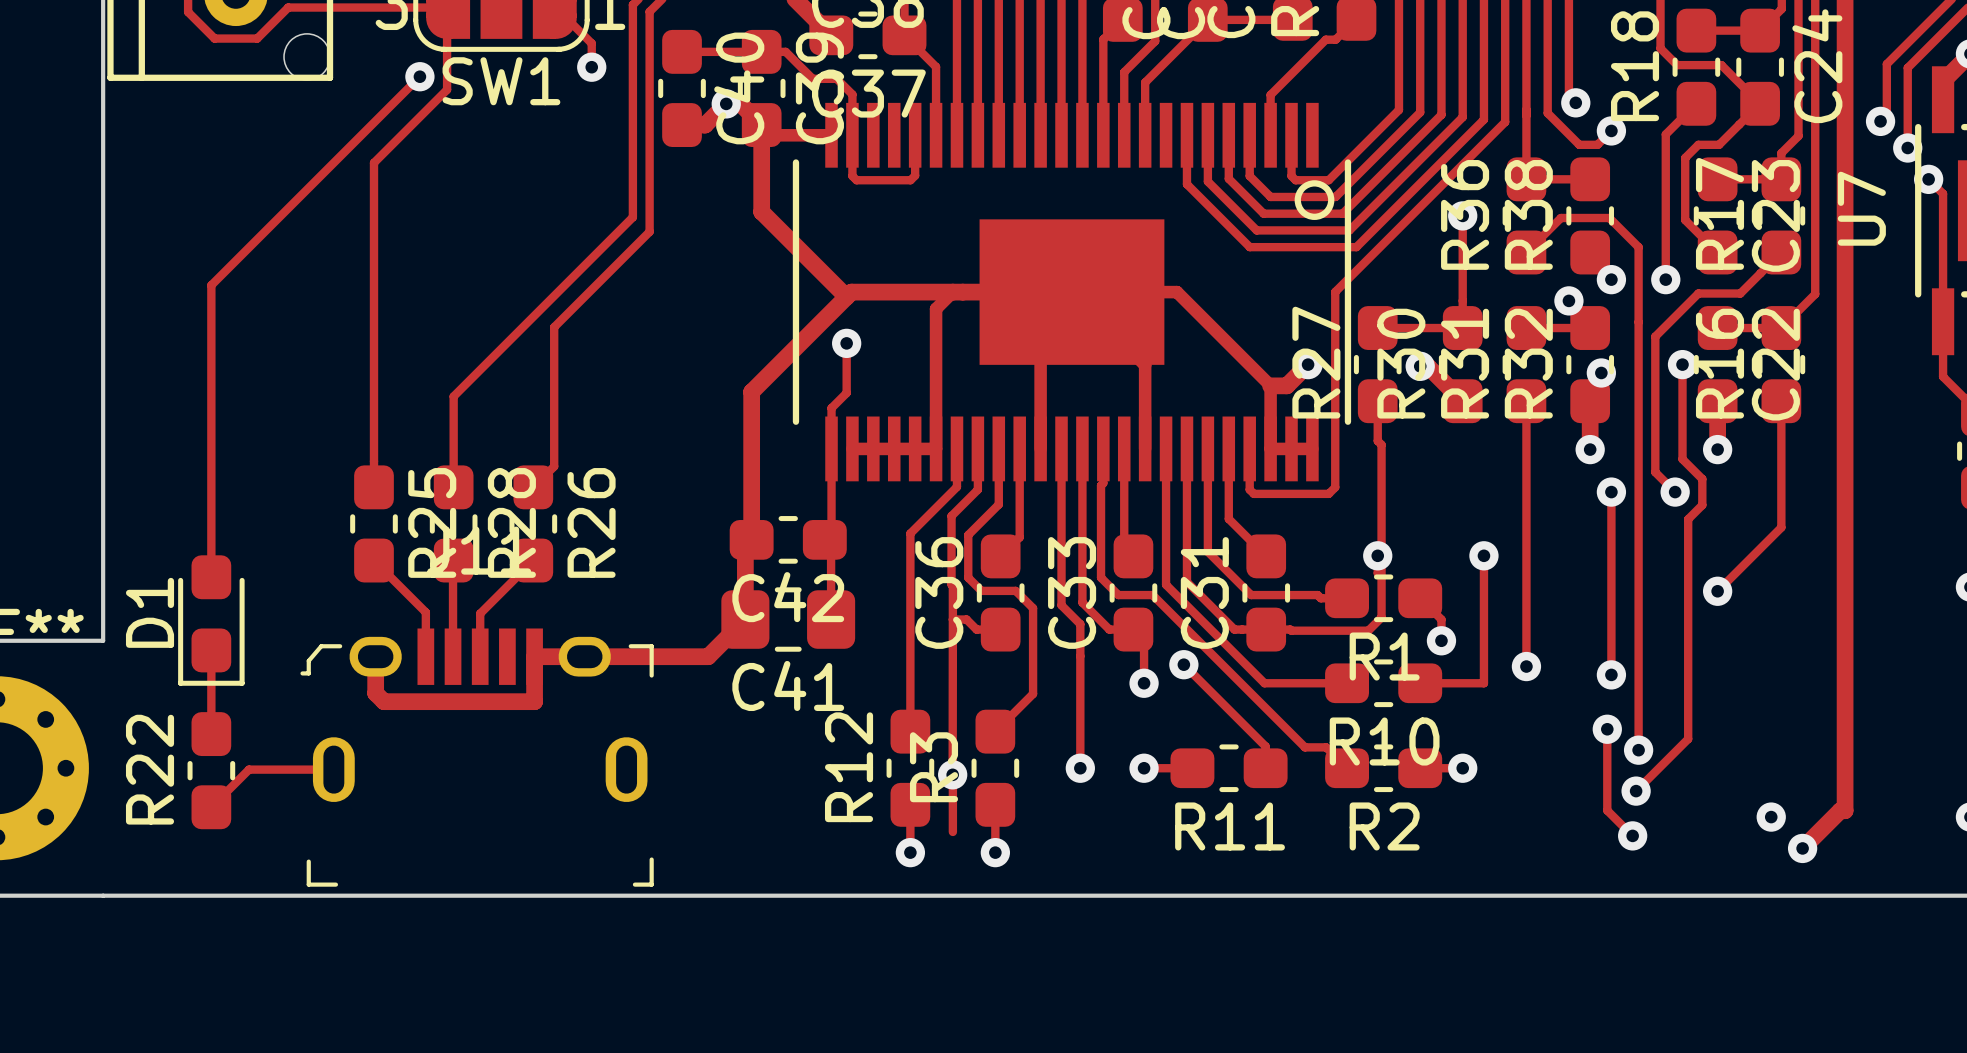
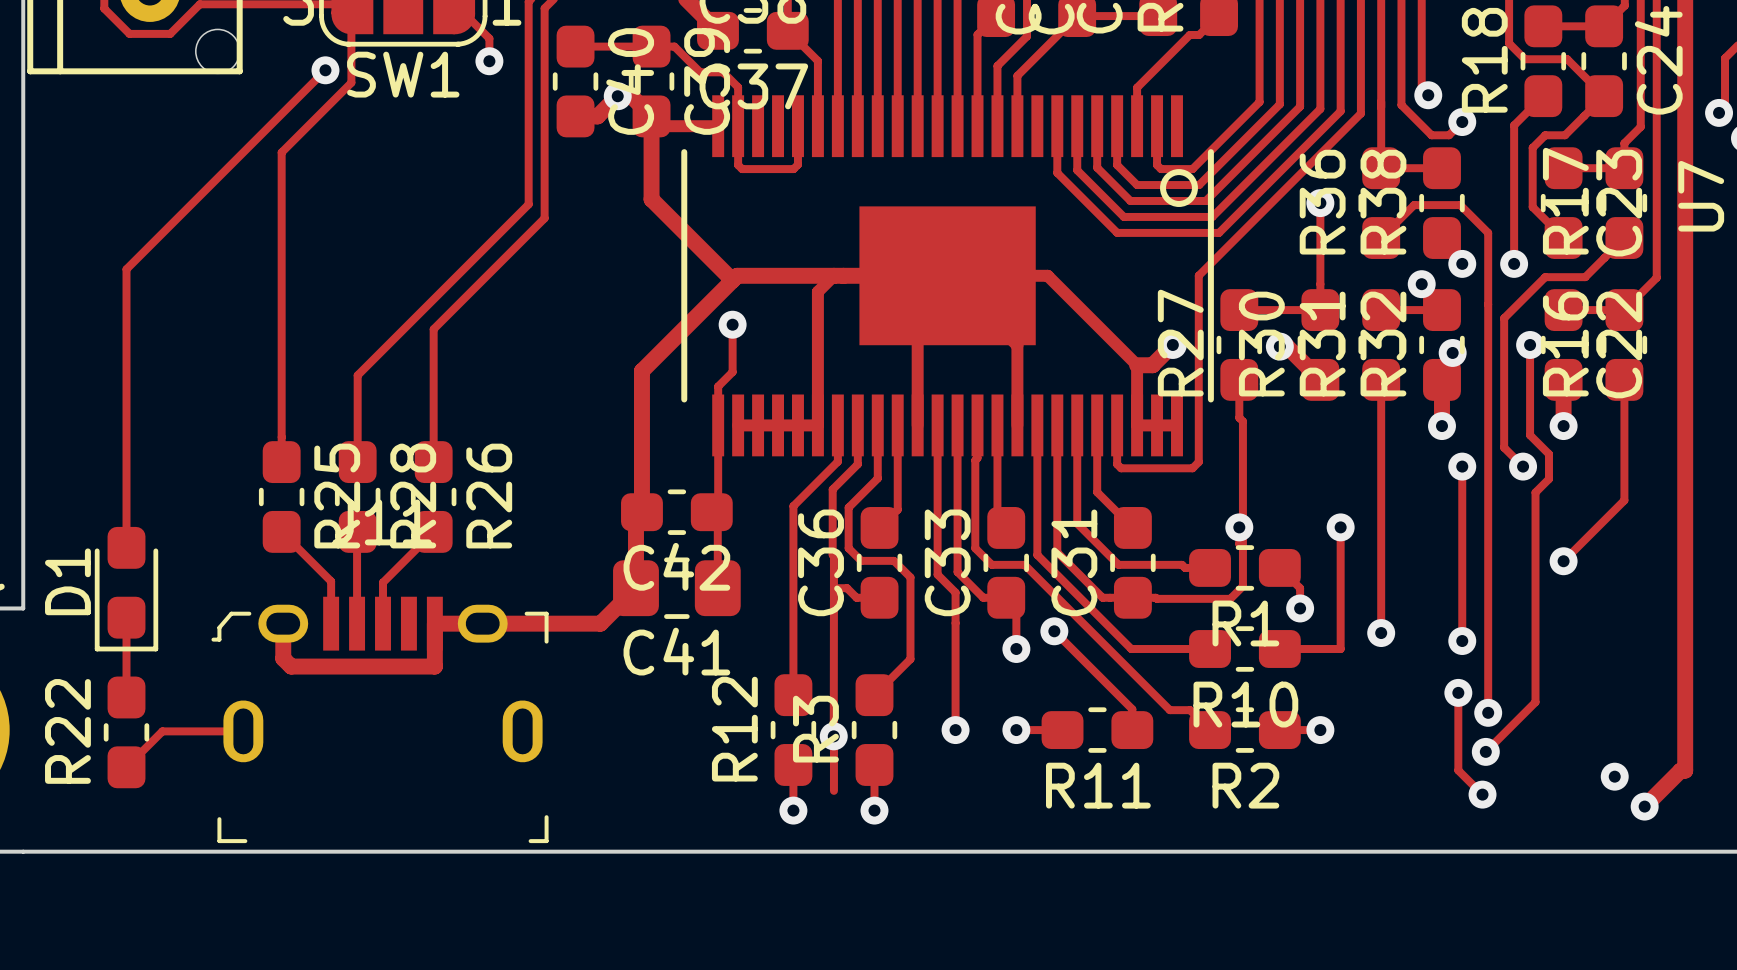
track: (554, 327) (554, 466) (533, 487) -> (453, 309) (433, 329) (433, 462)

